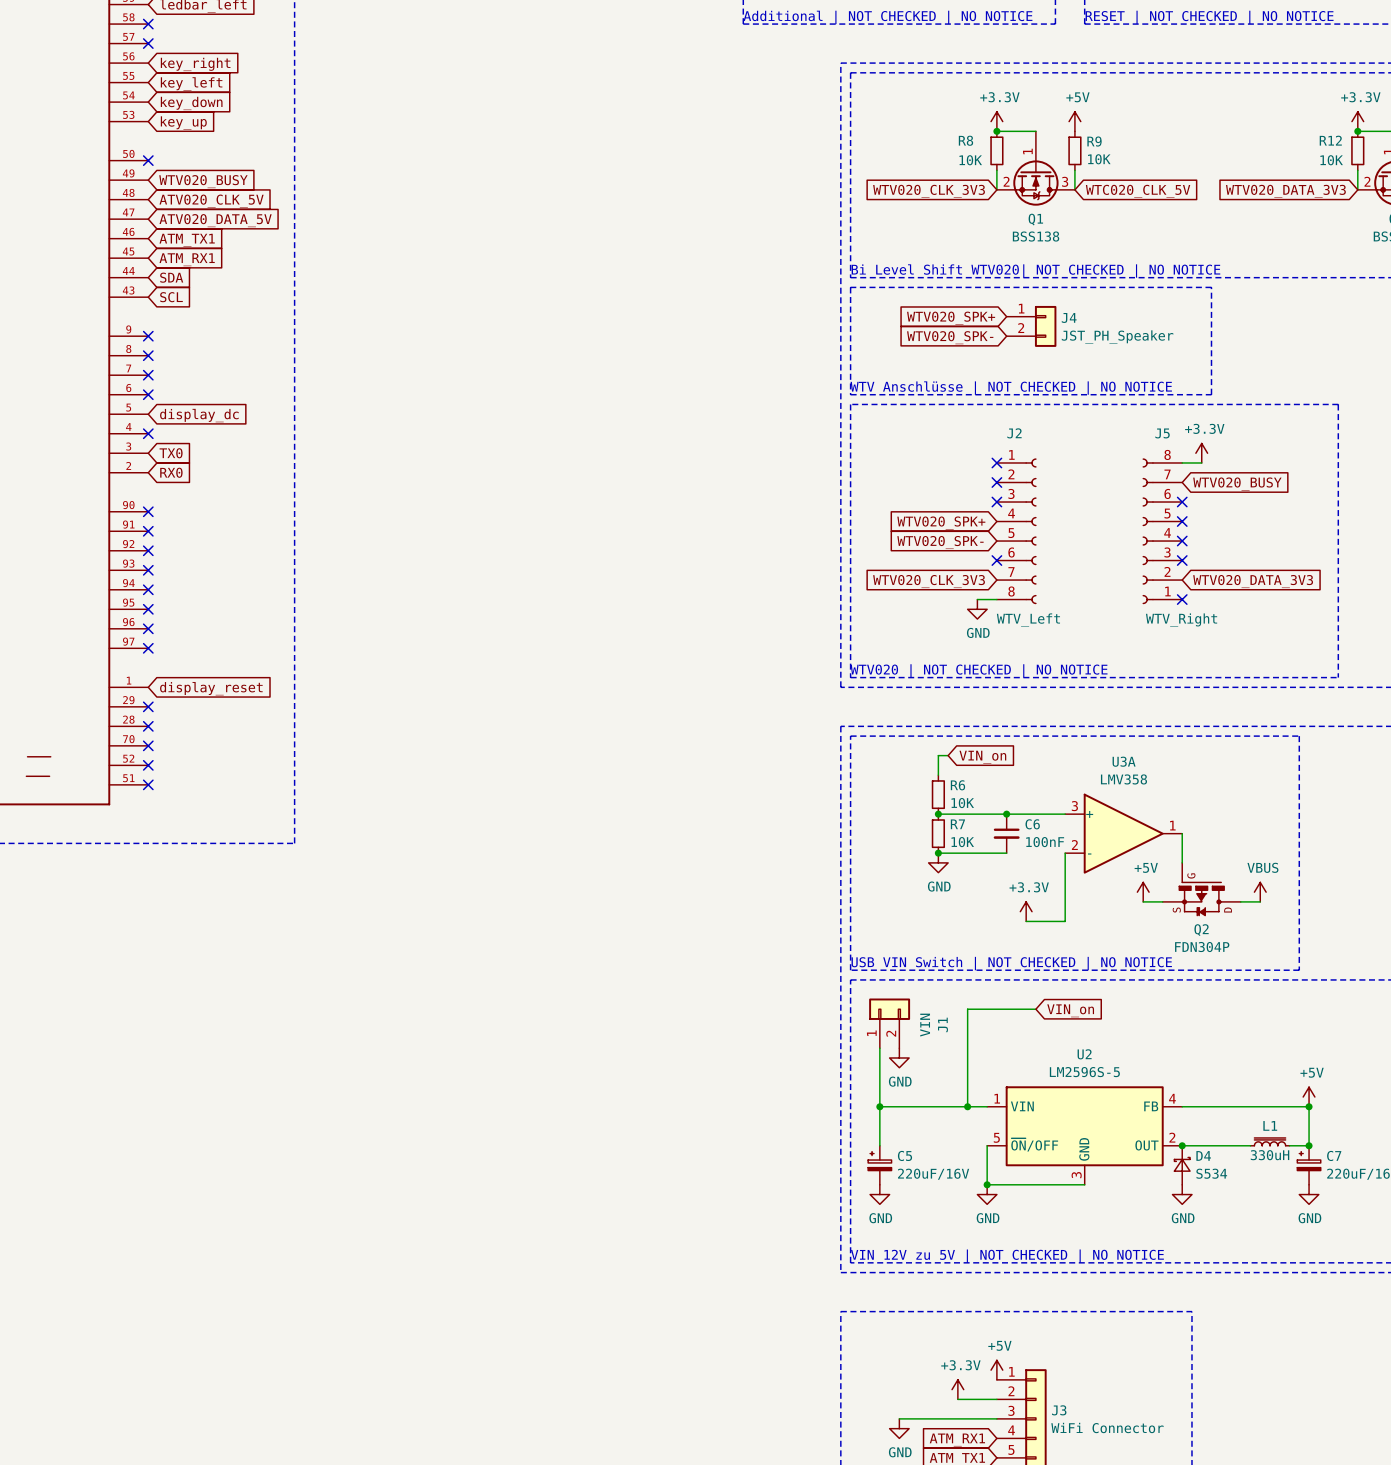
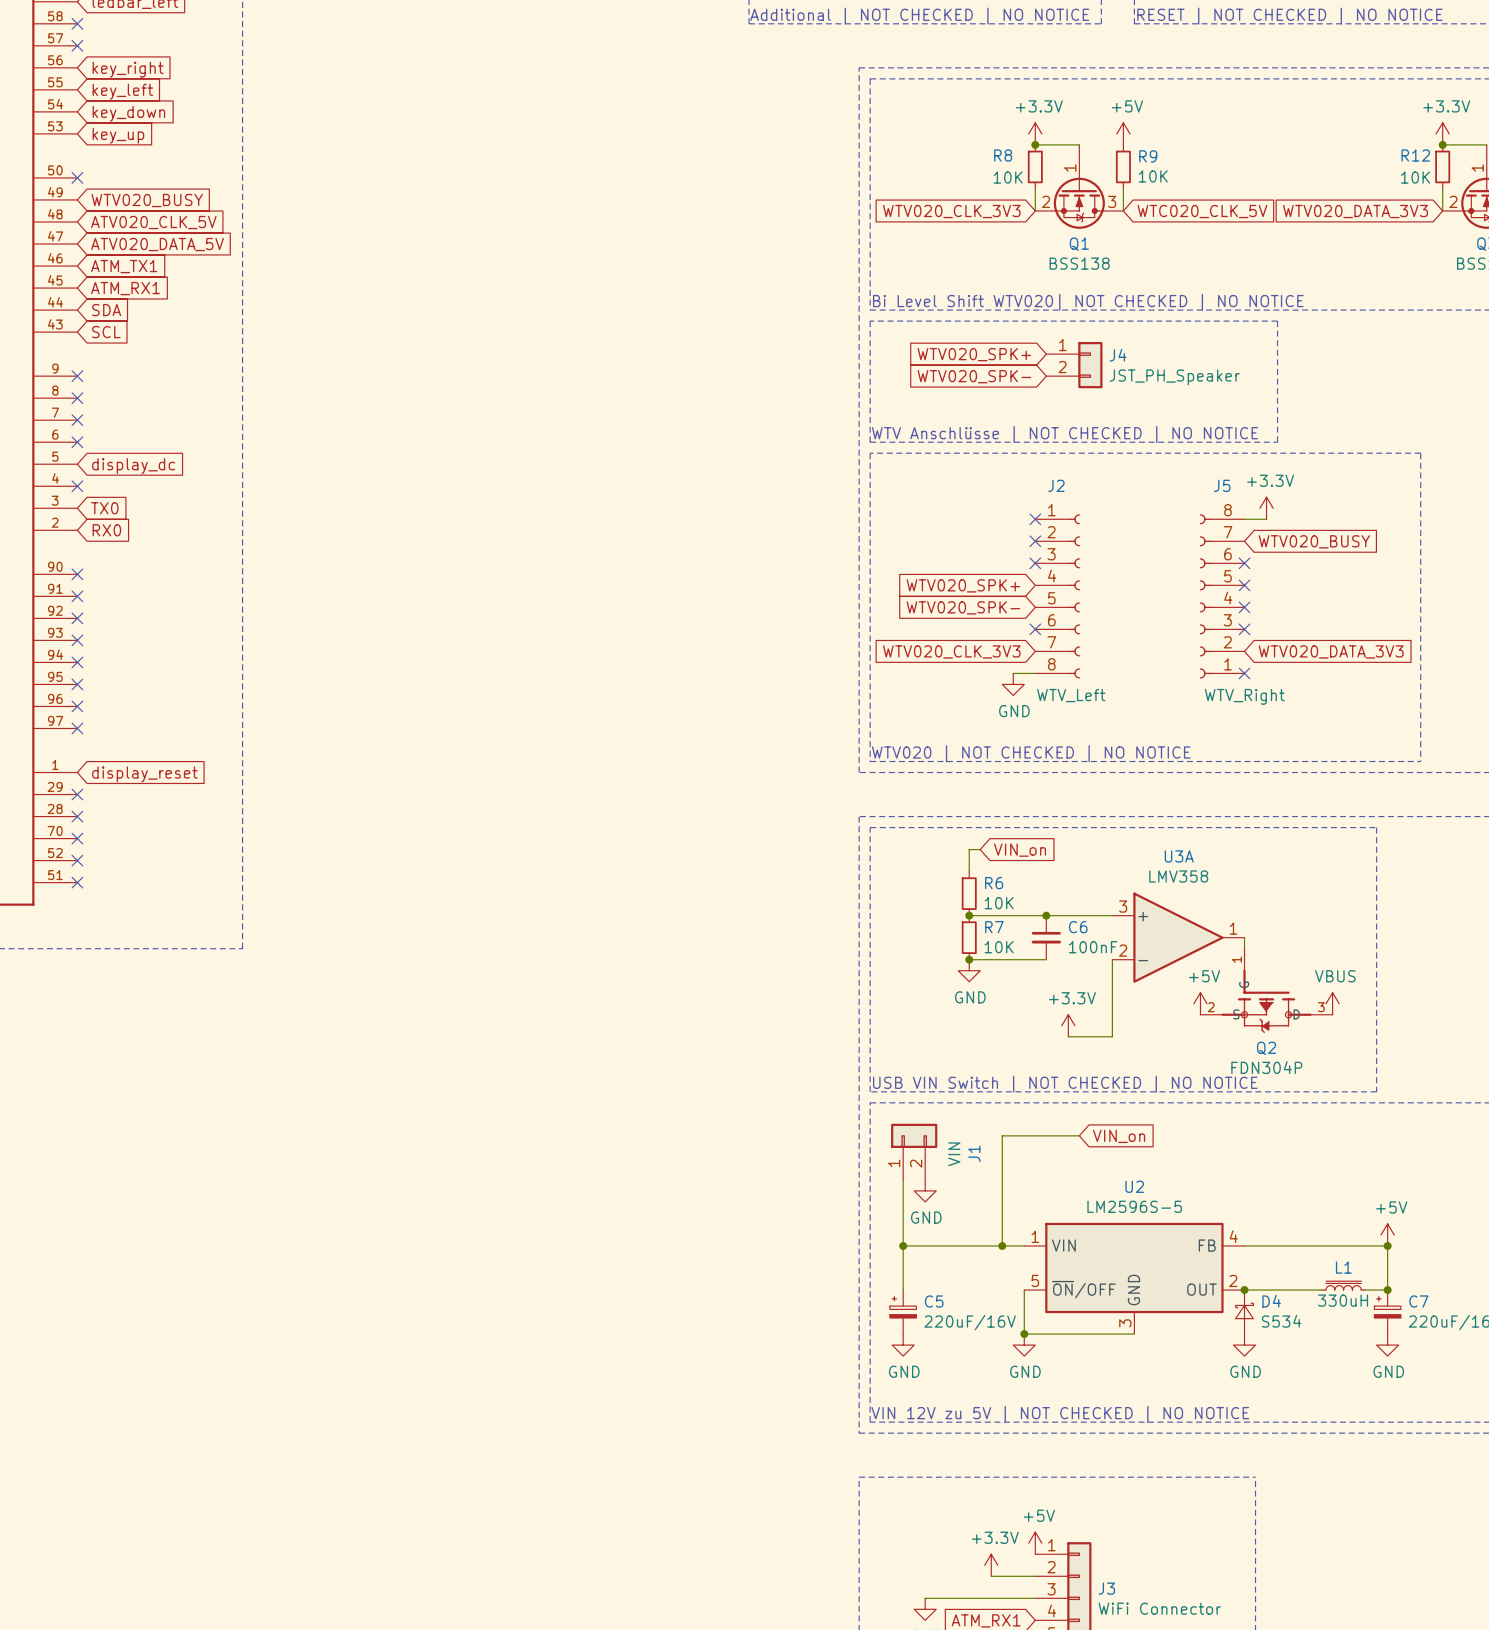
Q2 symbol: [1162, 862, 1241, 917] -> [1200, 948, 1333, 1034]

